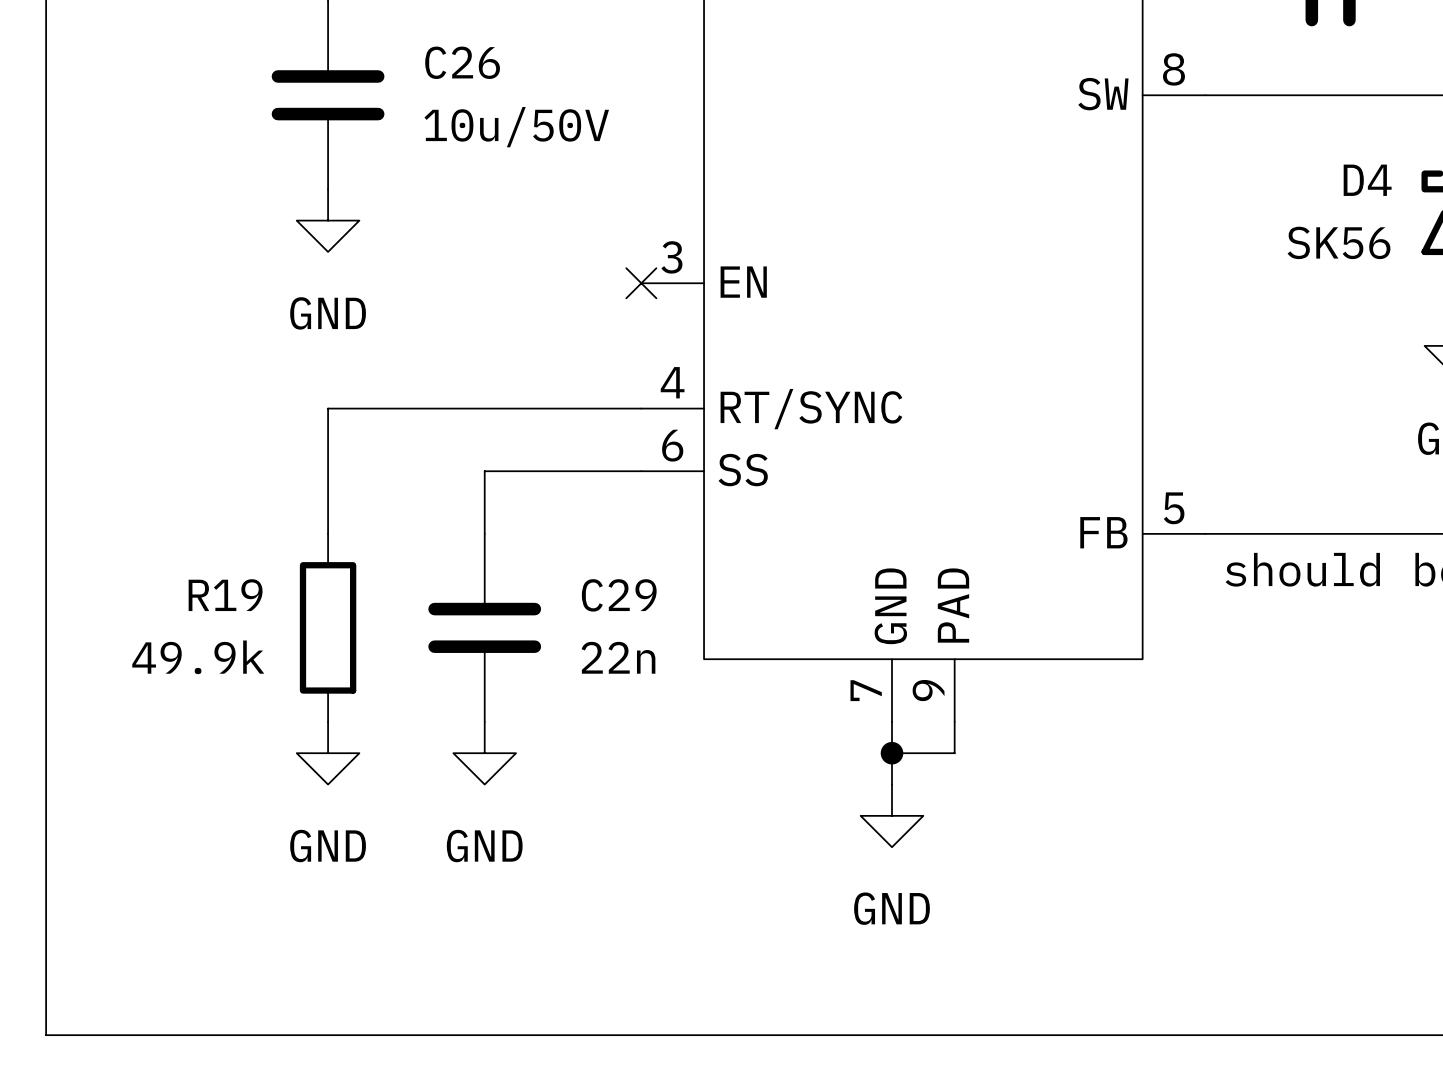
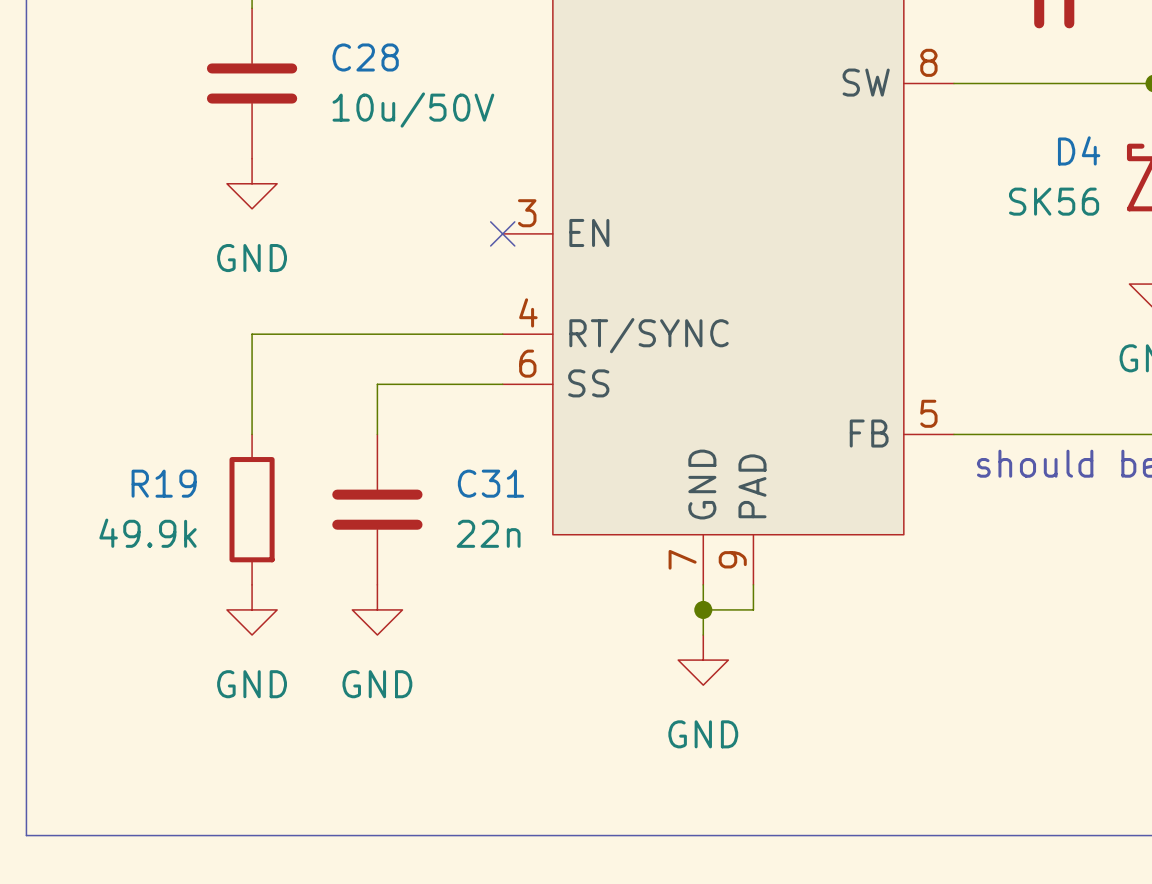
C26 name: C26 (462, 62) -> C28 (365, 57)
C29 name: C29 (619, 595) -> C31 (490, 483)

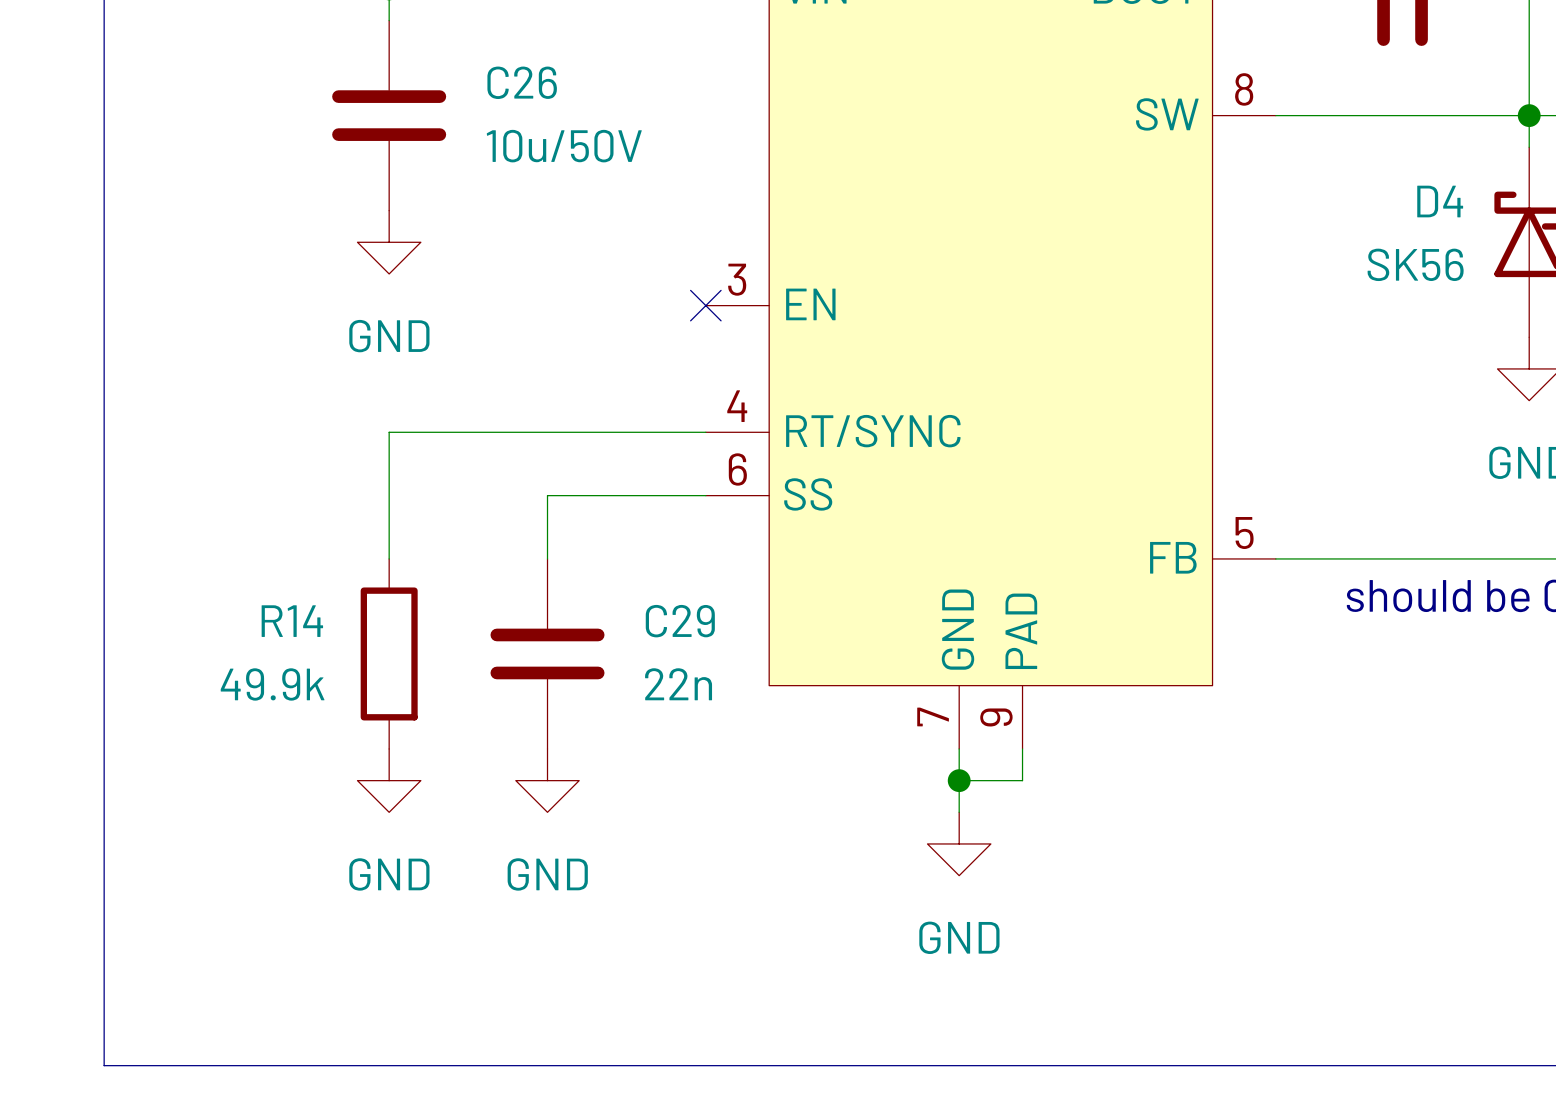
C28 name: C28 (365, 57) -> C26 (522, 82)
R19 name: R19 (164, 483) -> R14 (292, 621)
C31 name: C31 (490, 483) -> C29 (680, 621)

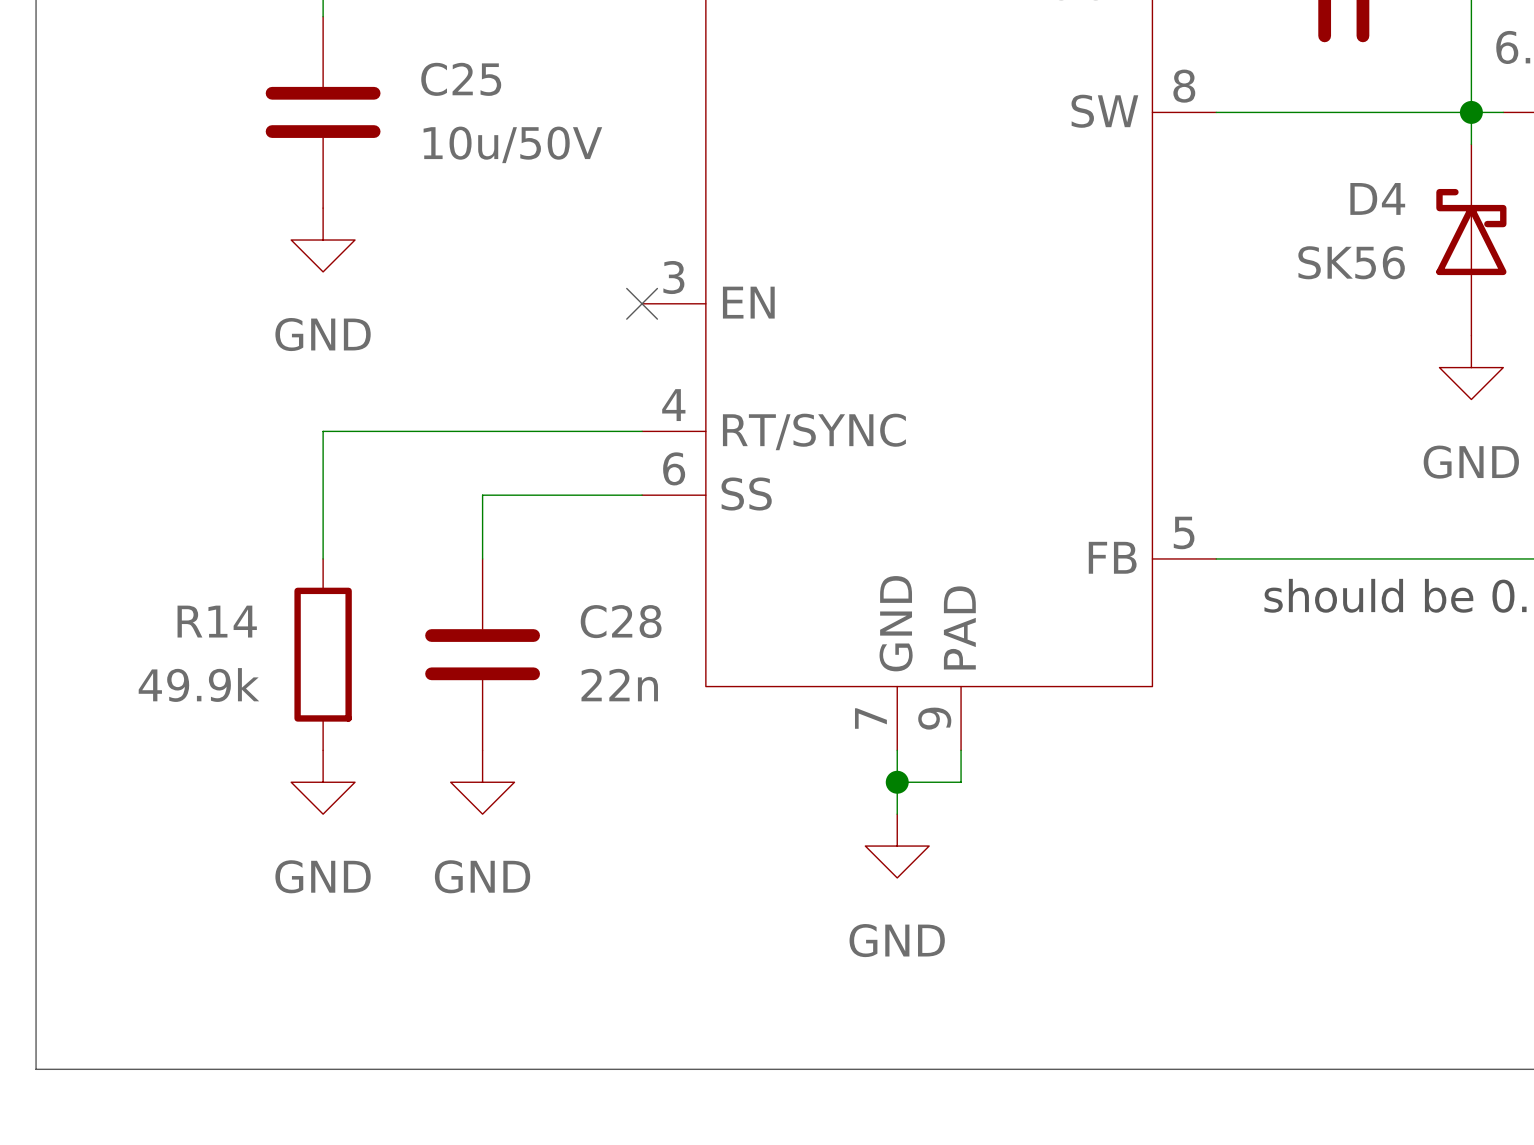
C26 name: C26 (522, 82) -> C25 (461, 79)
C29 name: C29 (680, 621) -> C28 (621, 621)

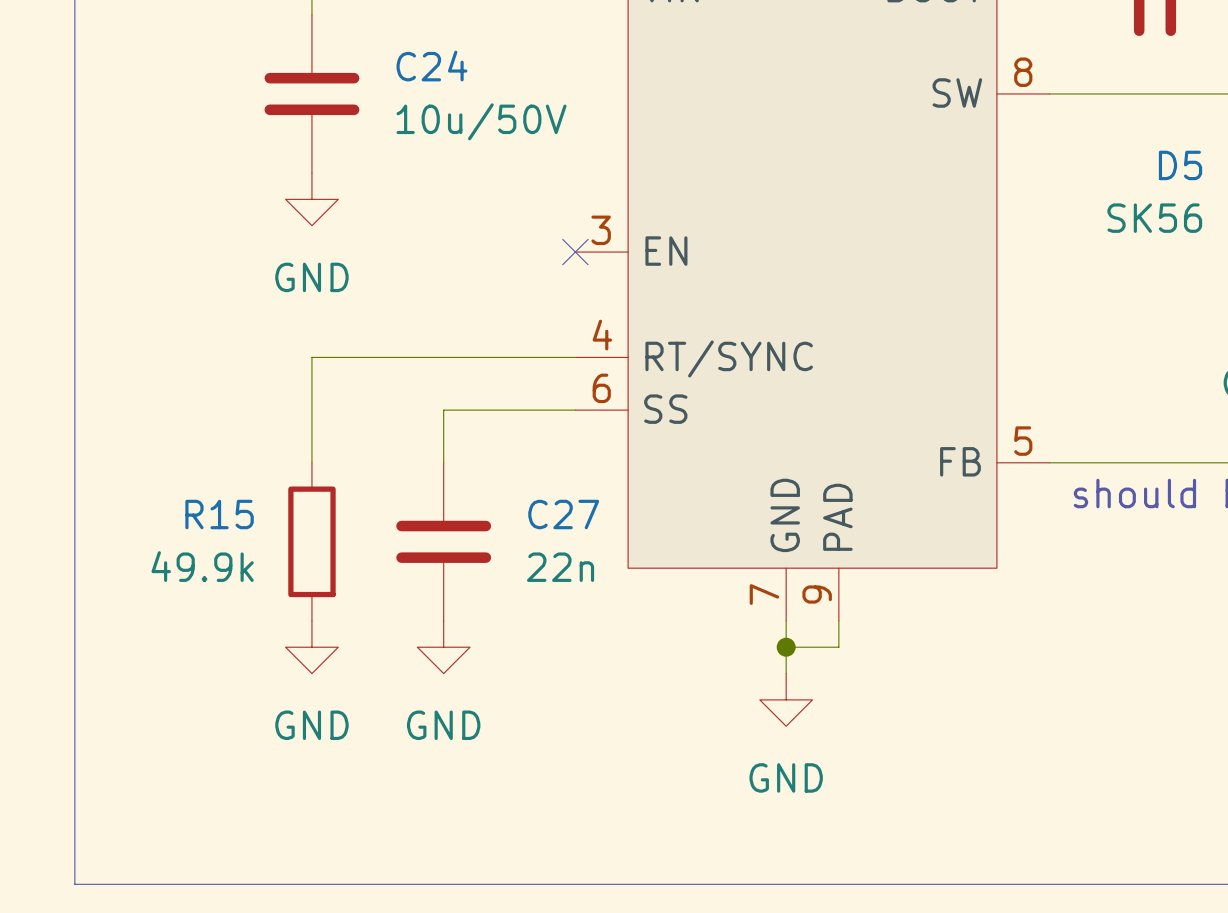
C25 name: C25 (461, 79) -> C24 (431, 66)
D4 name: D4 (1377, 198) -> D5 (1180, 165)
R14 name: R14 (217, 621) -> R15 (219, 514)
C28 name: C28 (621, 621) -> C27 (563, 514)

